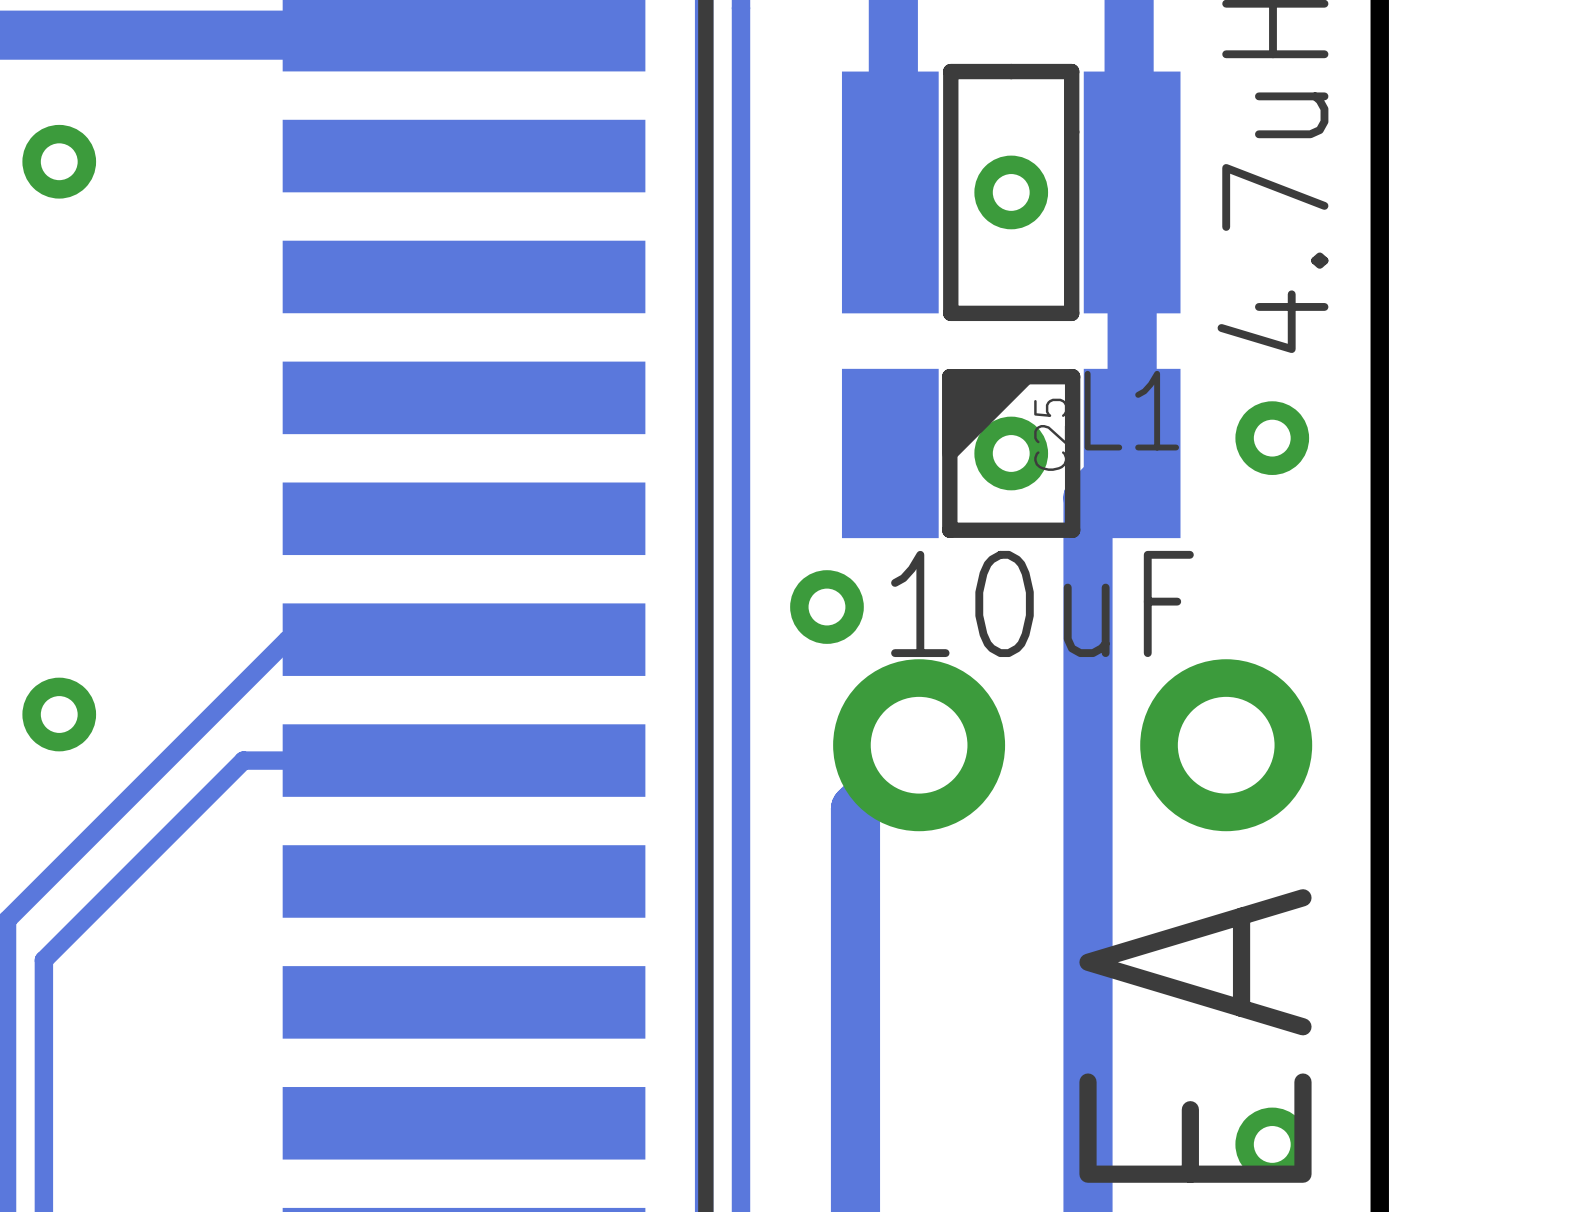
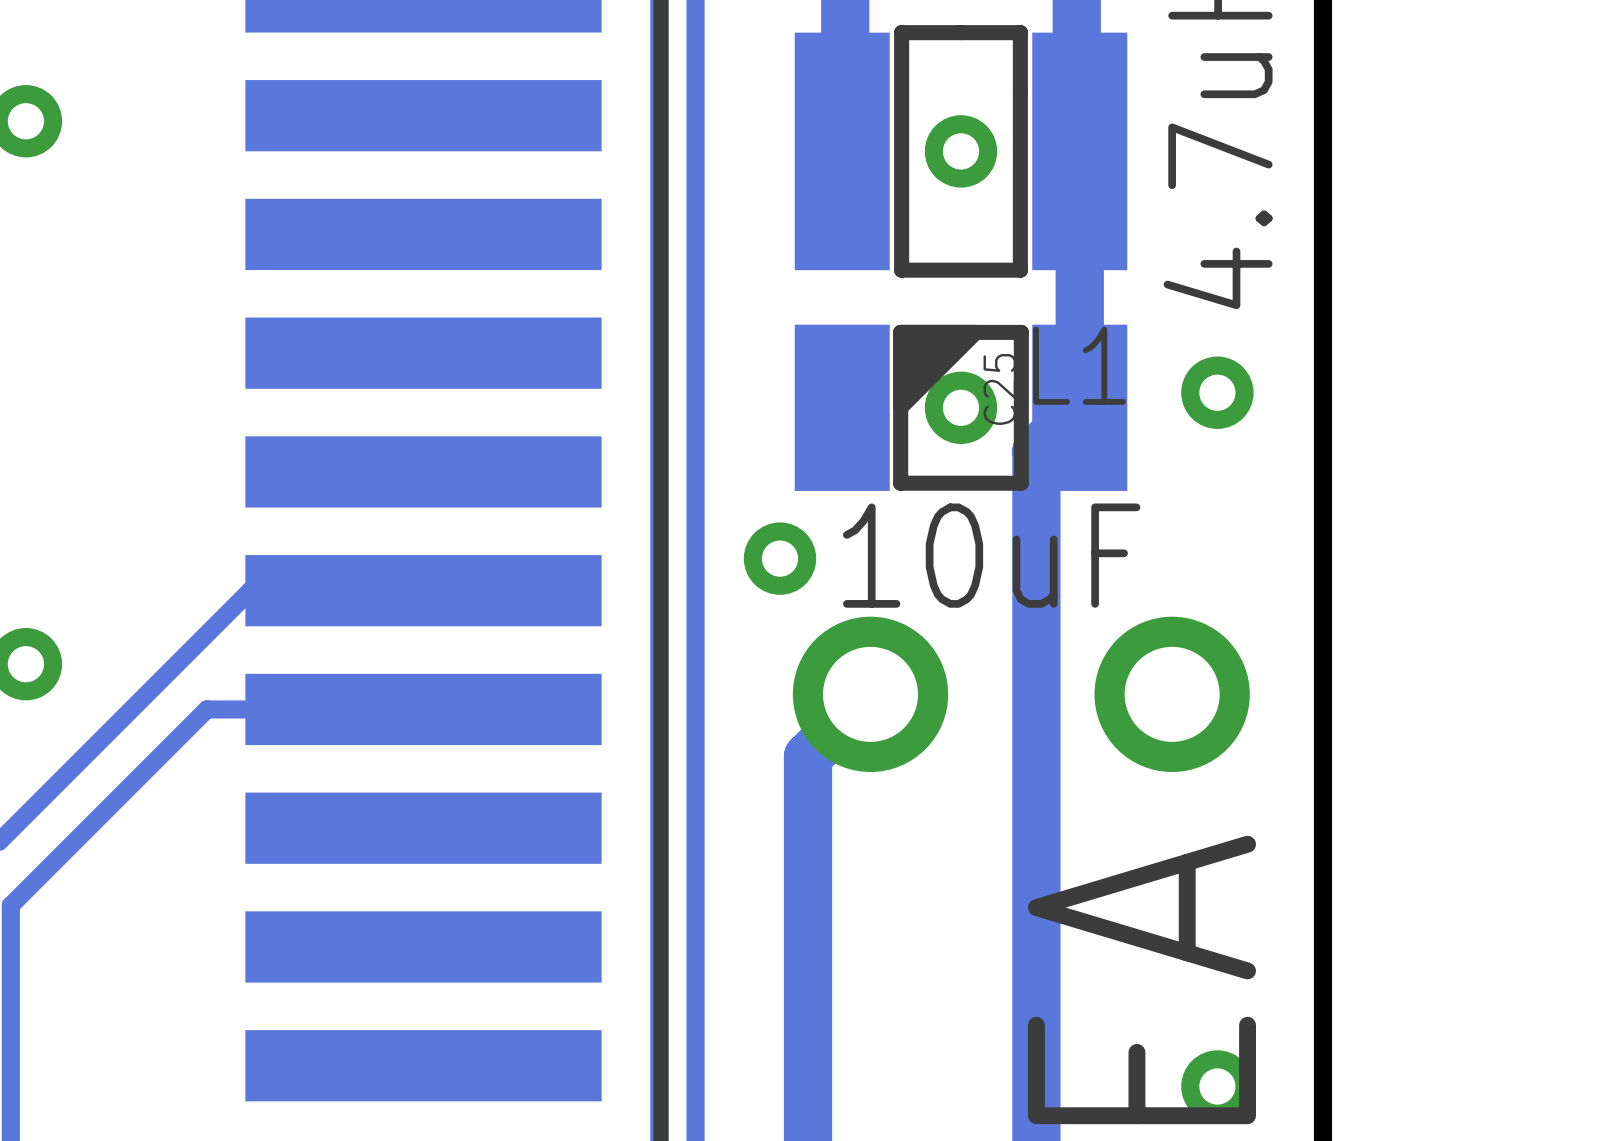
part footprint: [833, 659, 1313, 832] -> [792, 616, 1250, 773]

